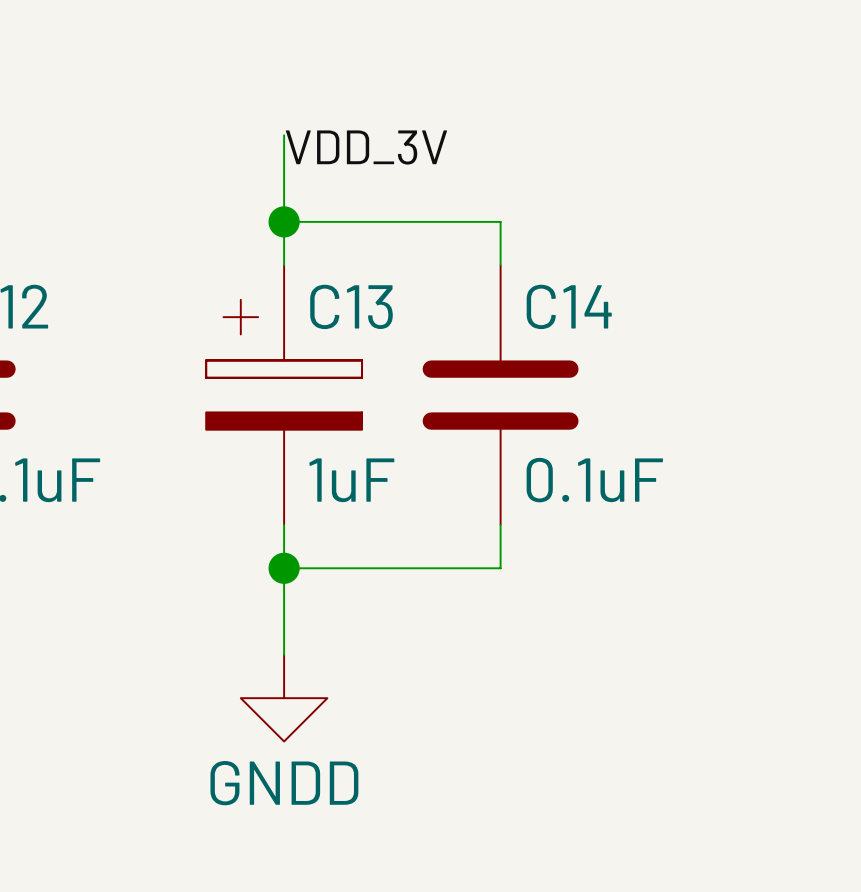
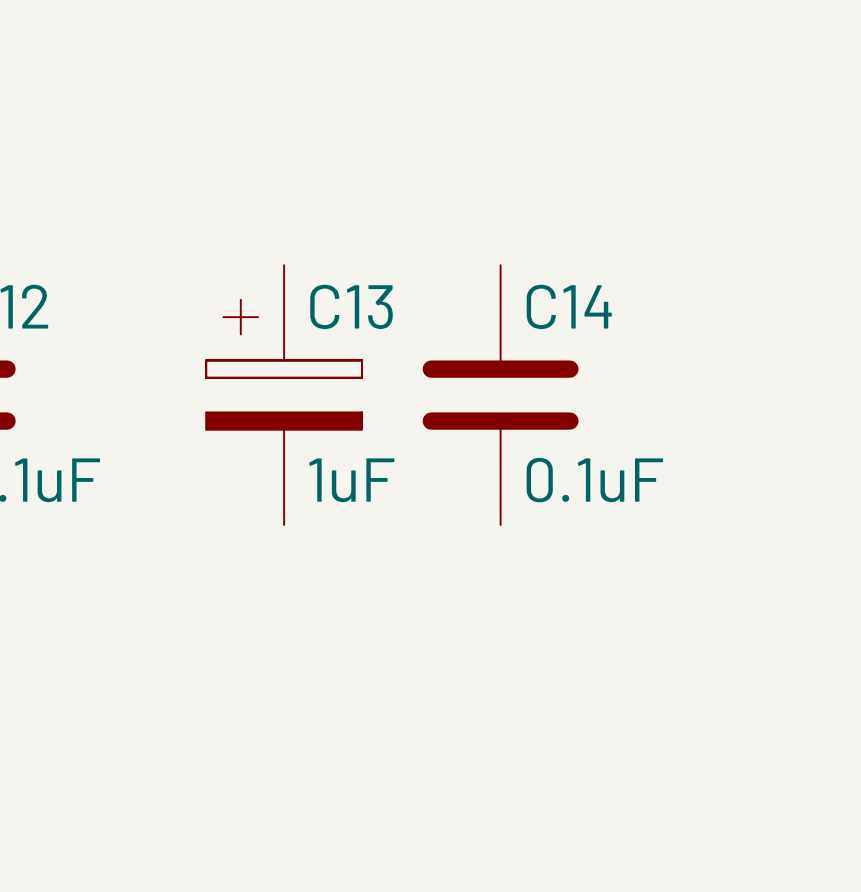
wire: (284, 135) (284, 265) -> none
label: VDD_3V (366, 147) -> none
wire: (284, 221) (500, 221) (500, 265) -> none
junction: (284, 221) -> none
wire: (284, 524) (284, 654) -> none
wire: (500, 524) (500, 568) (284, 568) -> none
junction: (284, 568) -> none
power symbol: GNDD (284, 698) -> none

